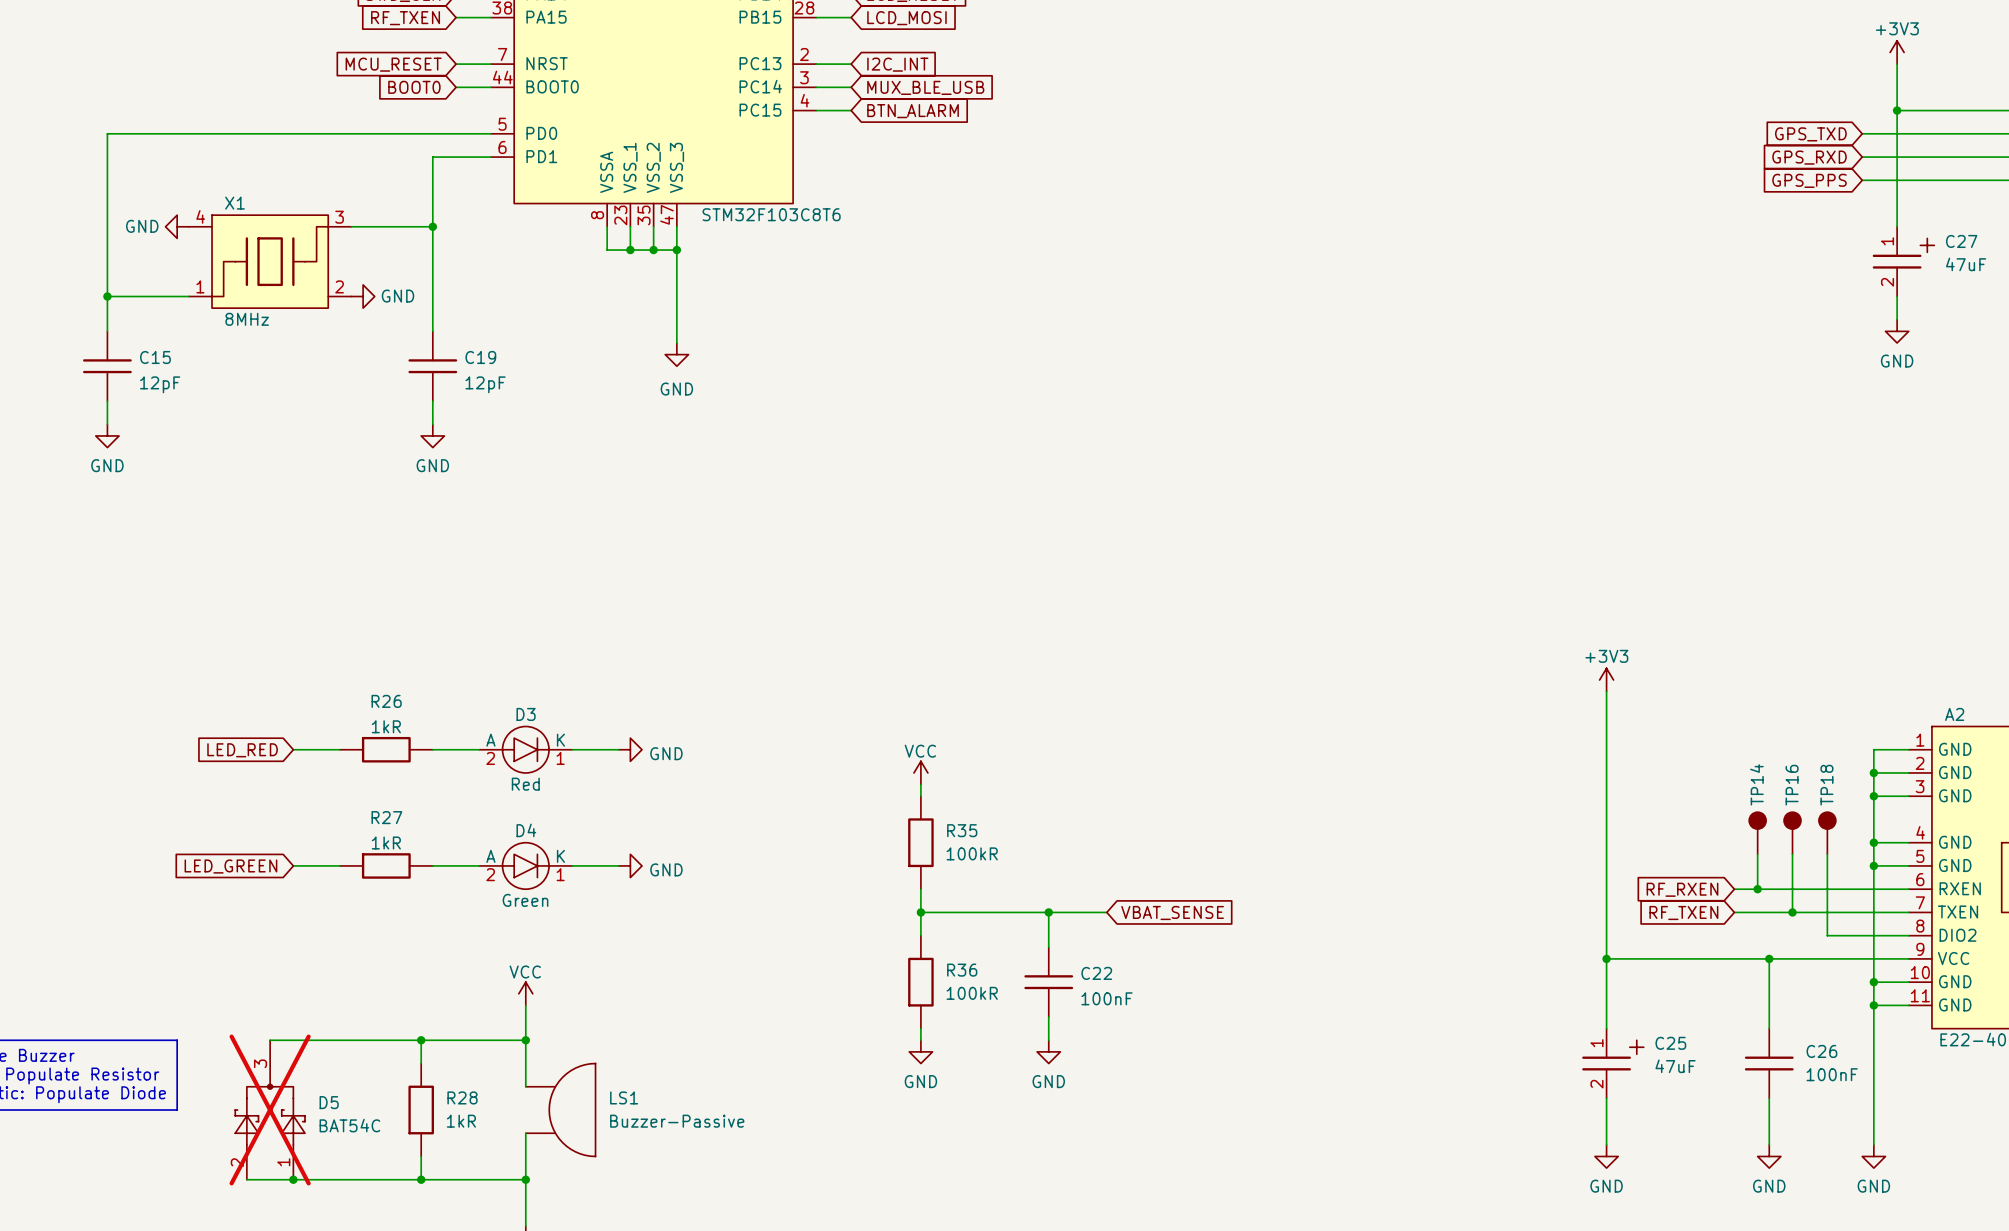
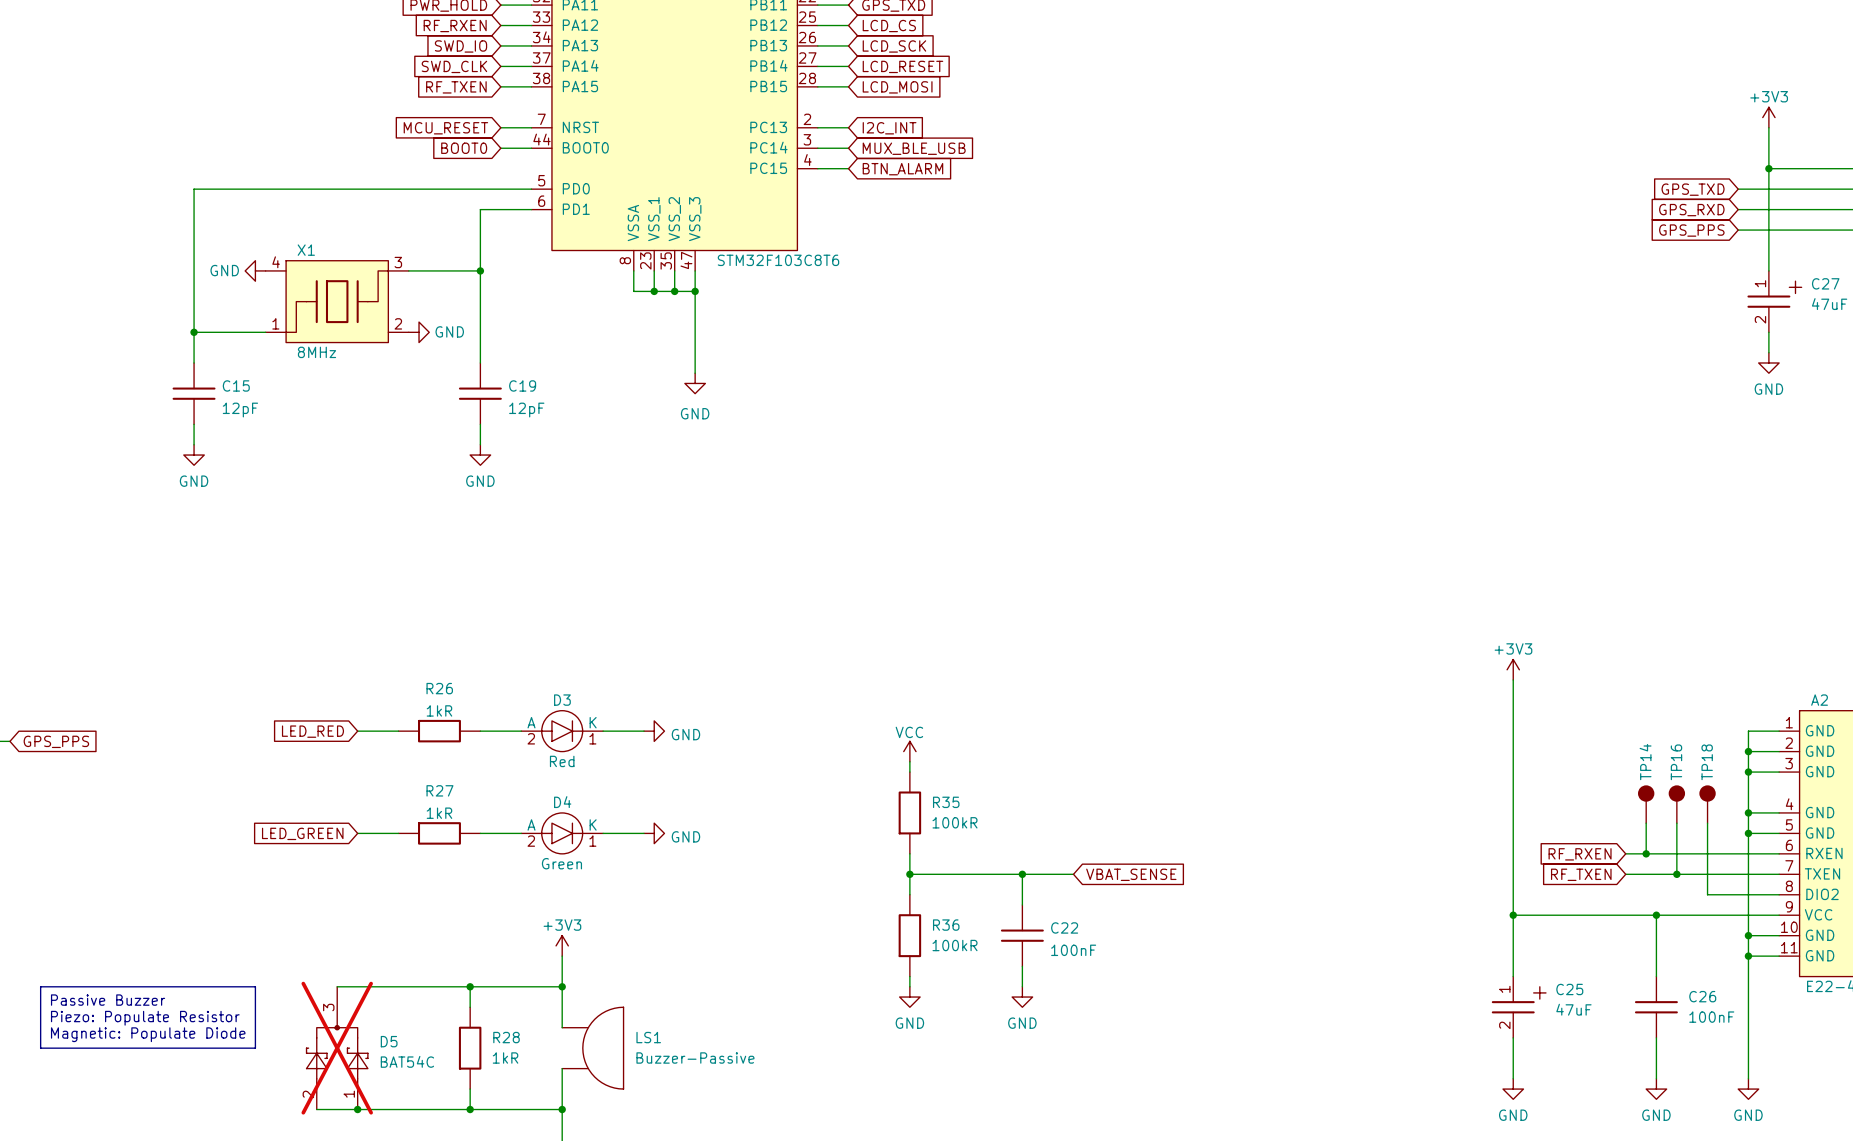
power symbol: VCC (525, 993) -> +3V3 (562, 945)

